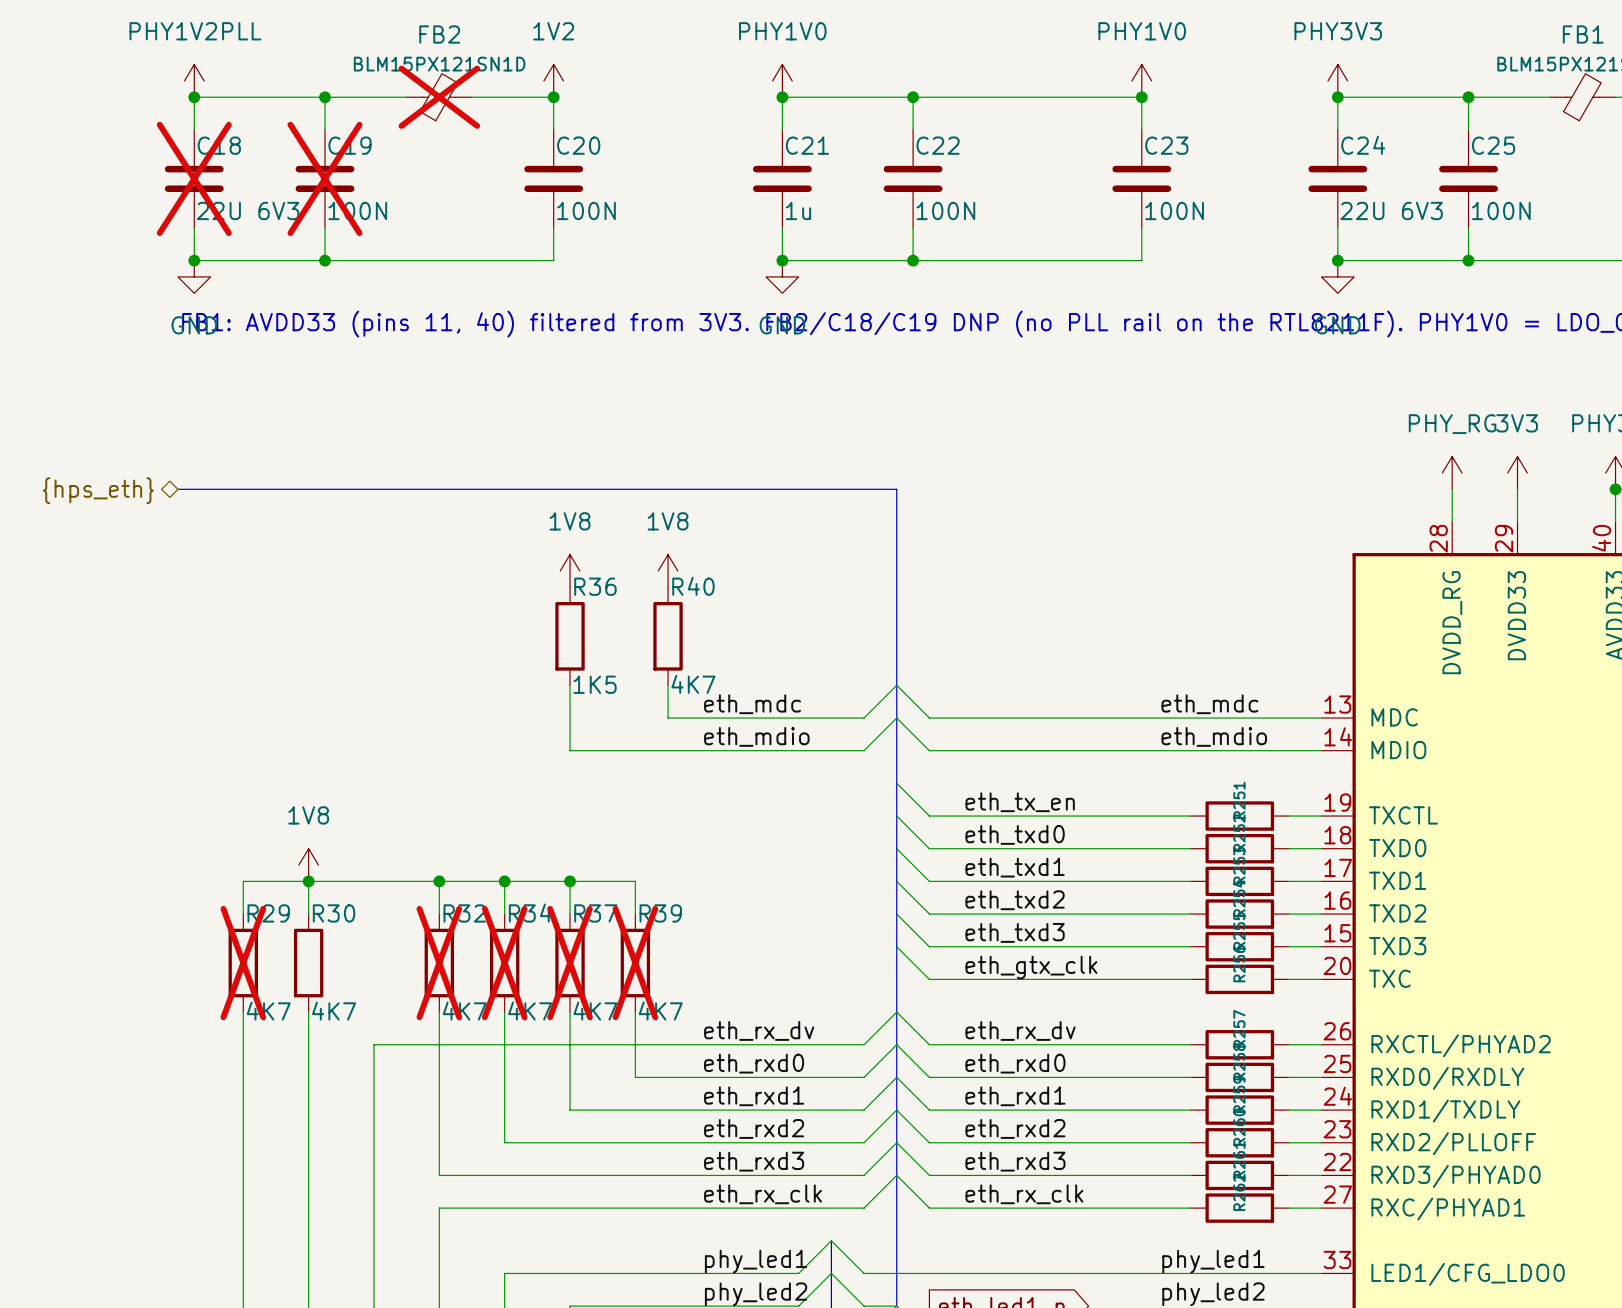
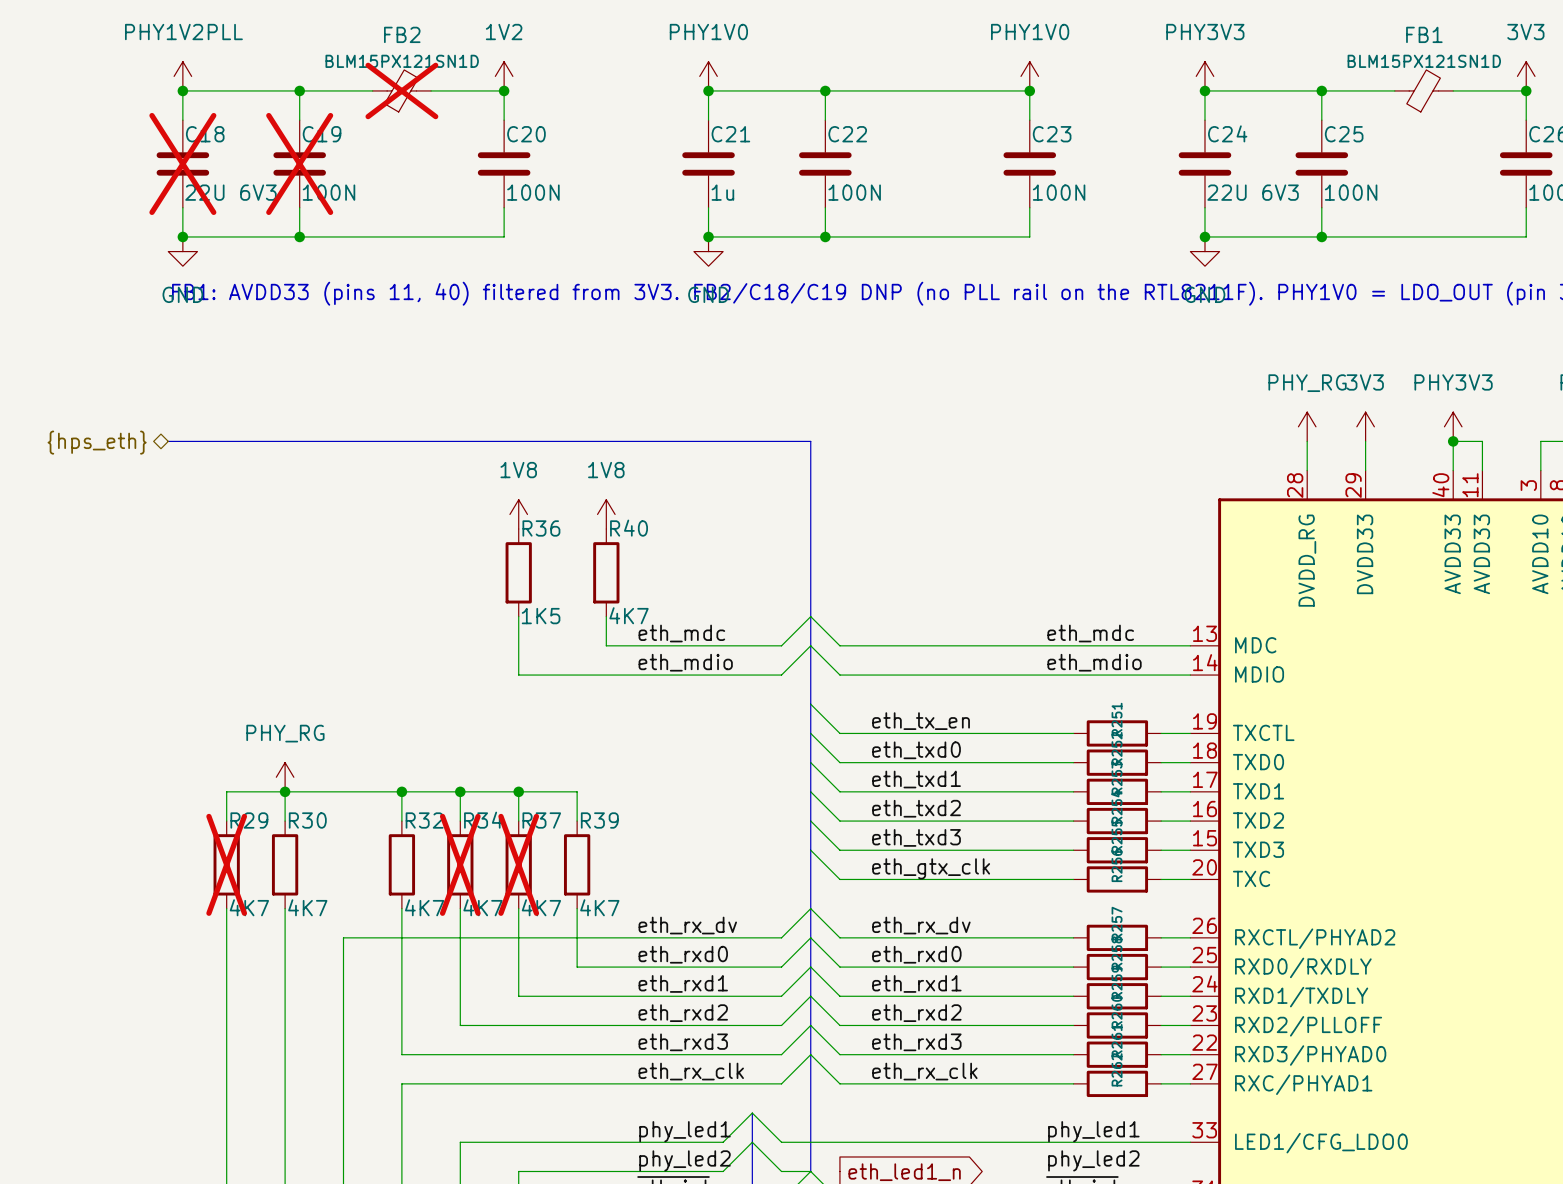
power symbol: 1V8 (308, 865) -> PHY_RG (285, 777)
R32 do-not-place cross: (439, 963) -> none
R39 do-not-place cross: (635, 963) -> none

